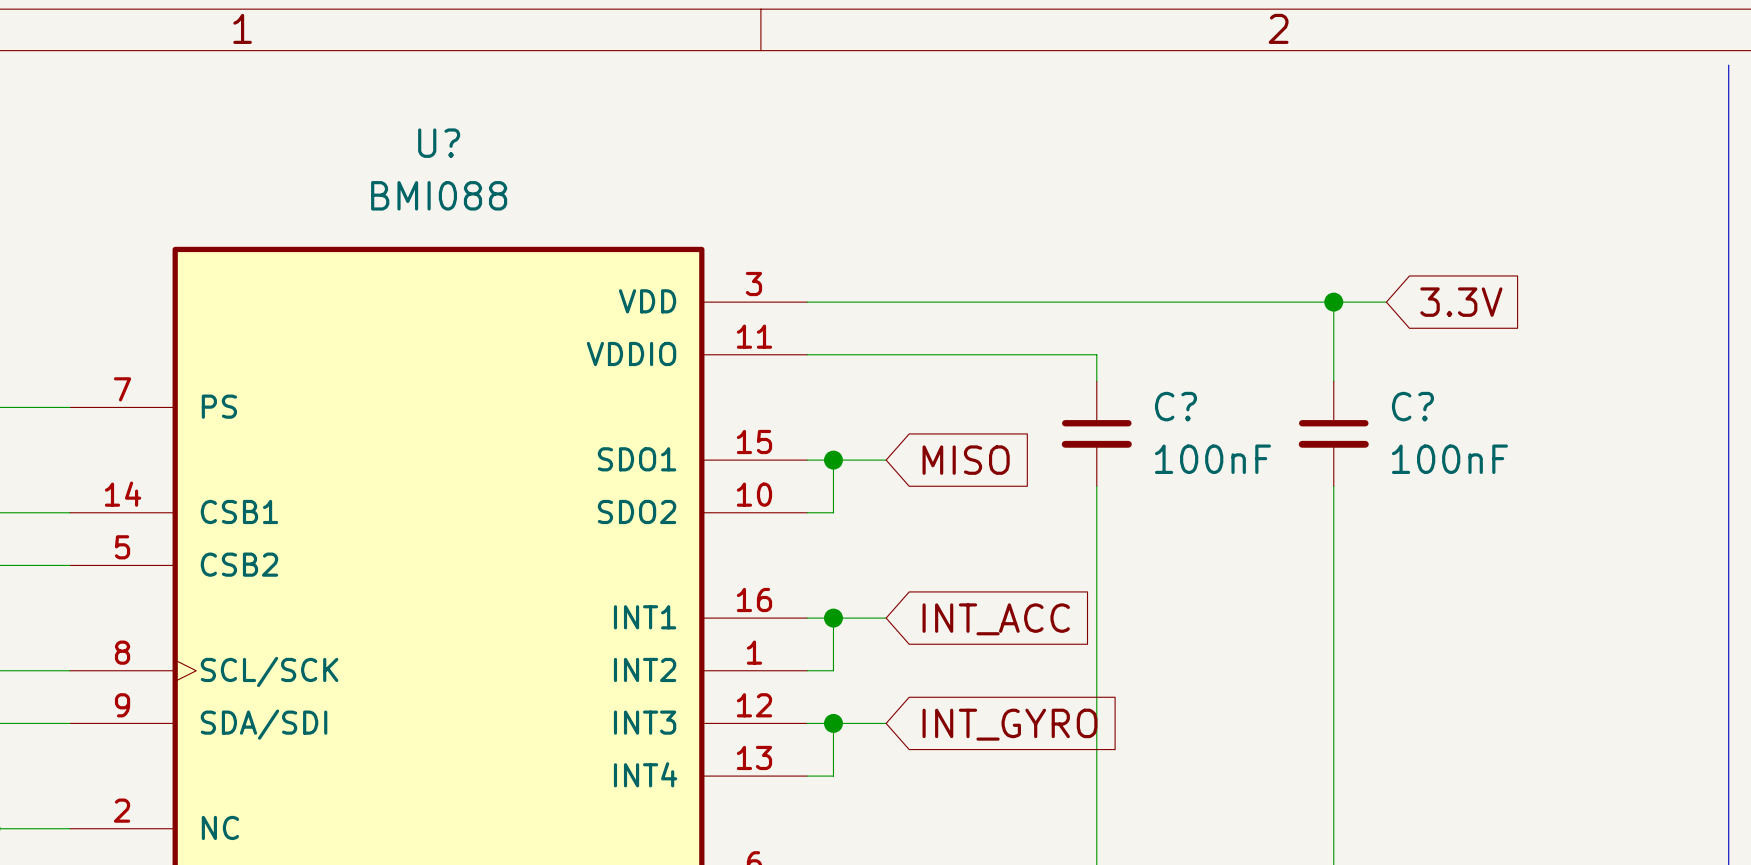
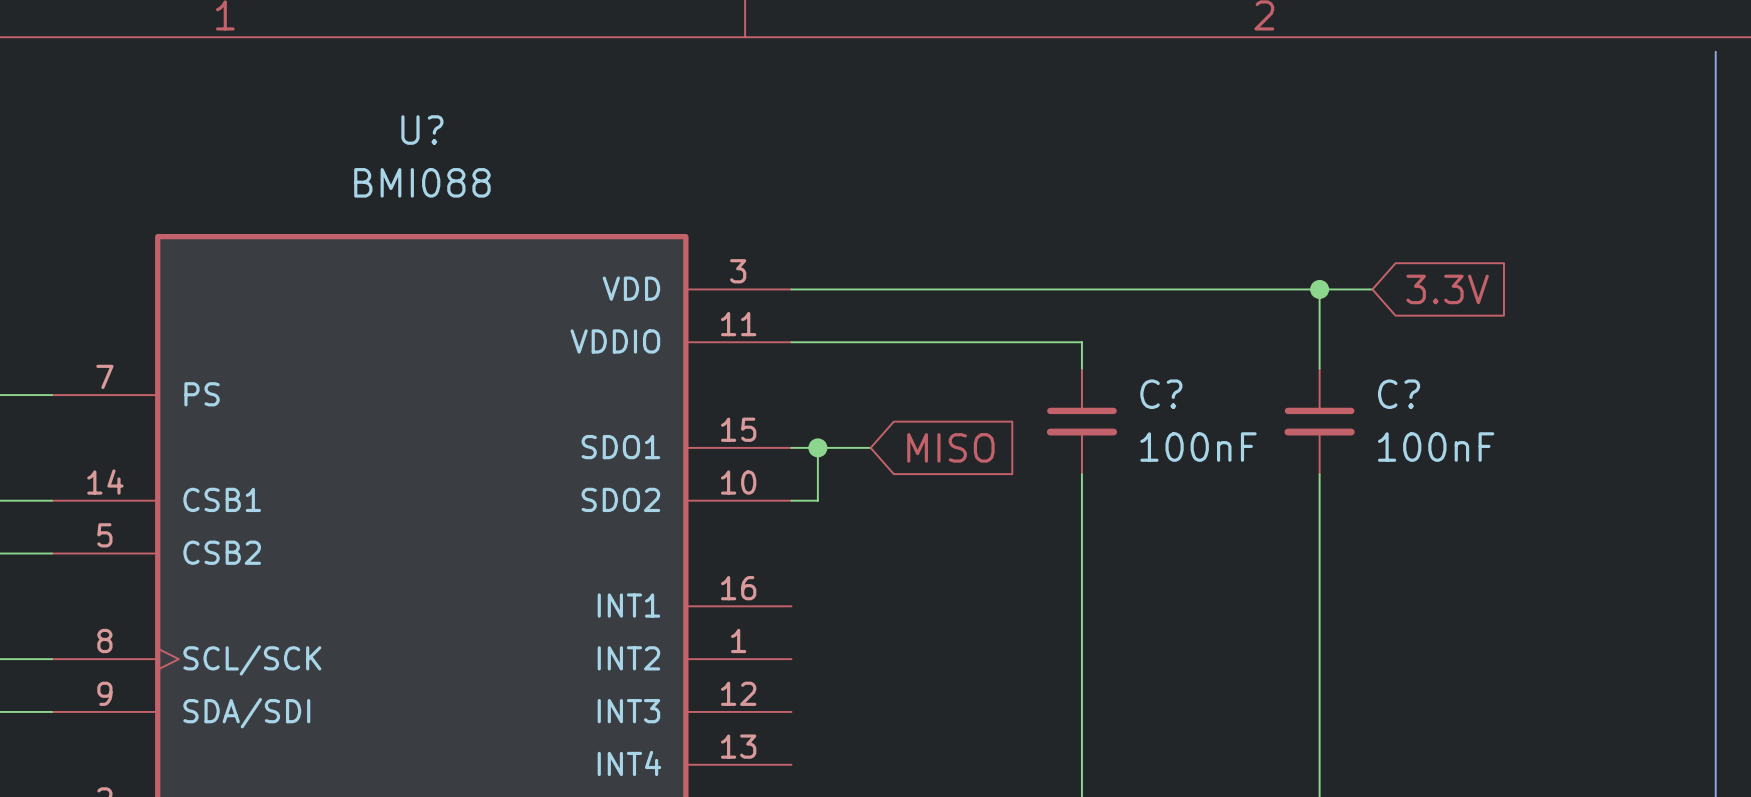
wire: (807, 618) (886, 618) -> none
wire: (833, 618) (833, 670) (807, 670) -> none
junction: (833, 618) -> none
global label: INT_ACC (996, 619) -> none
wire: (807, 723) (886, 723) -> none
wire: (833, 723) (833, 776) (807, 776) -> none
junction: (833, 723) -> none
global label: INT_GYRO (1009, 724) -> none

